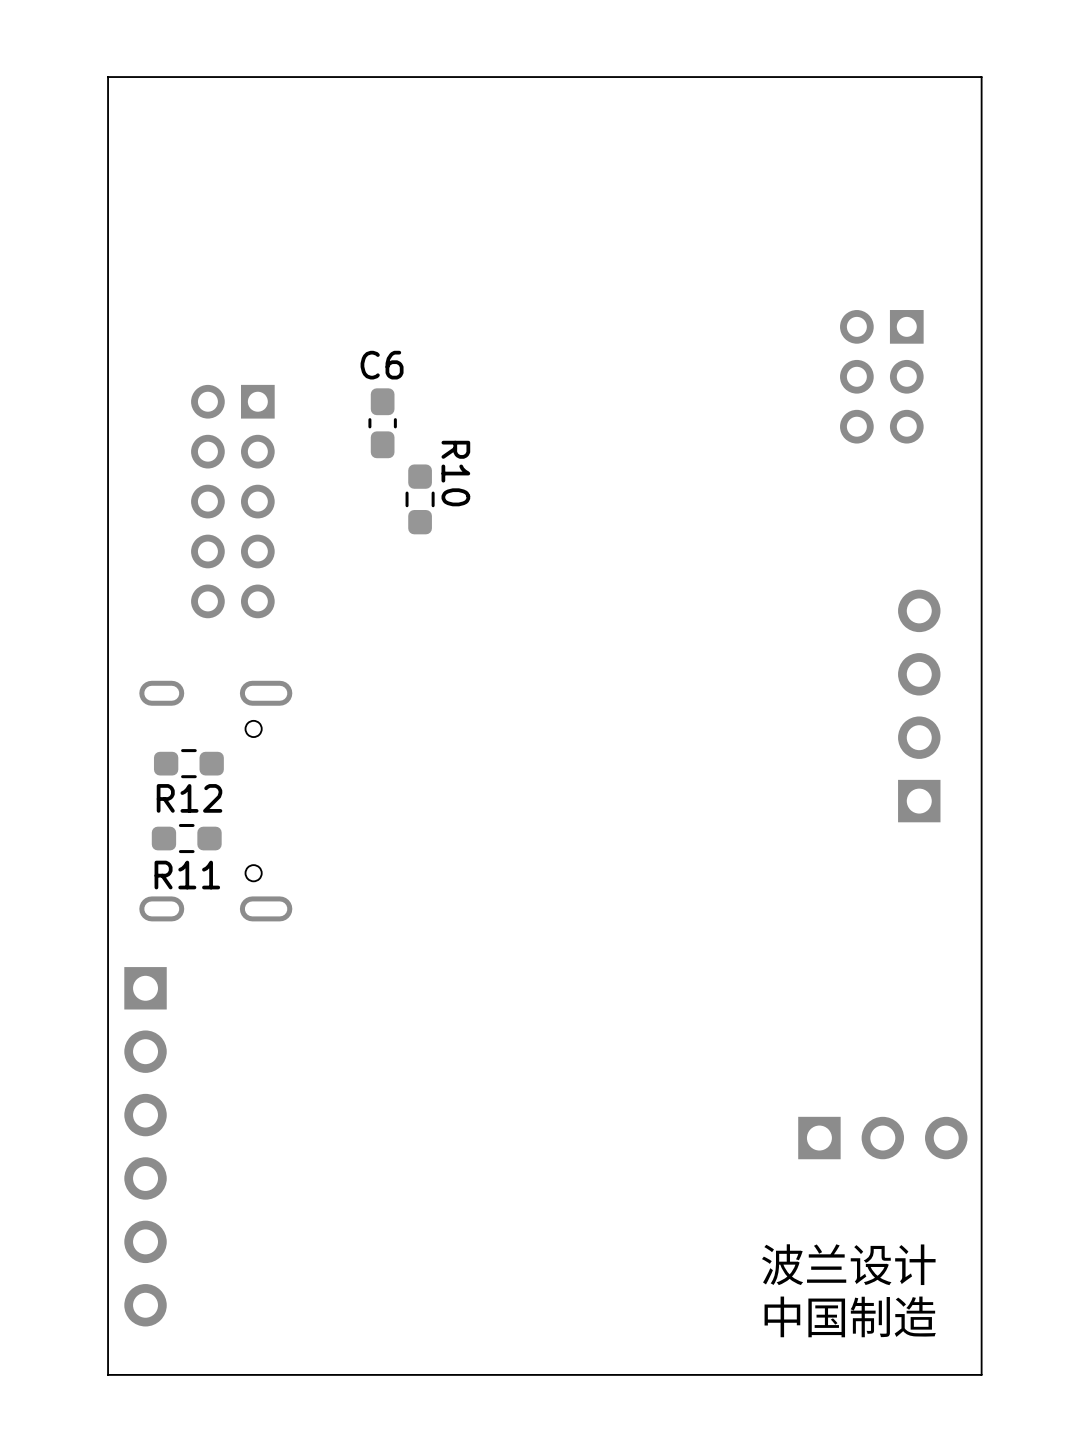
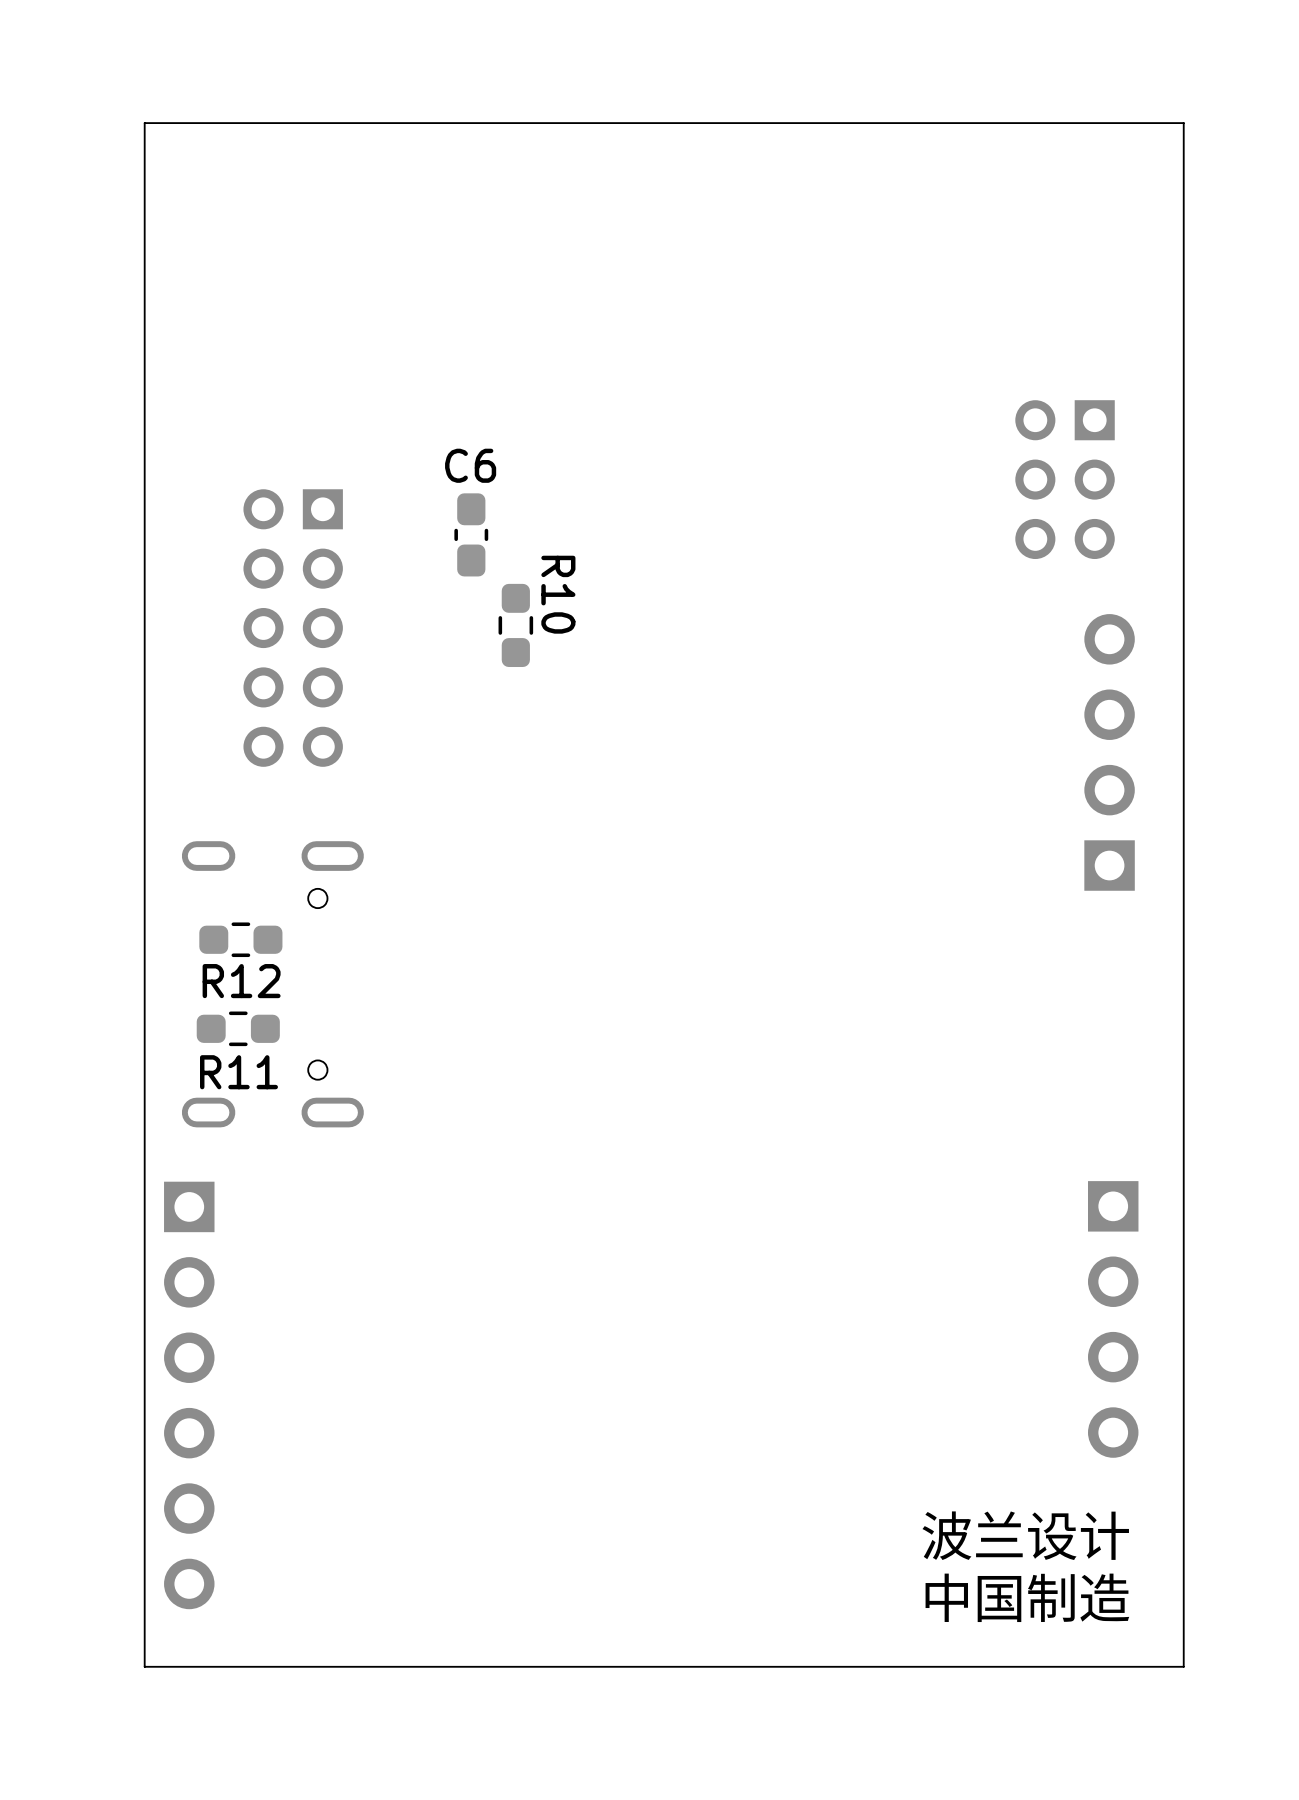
part position: (919, 705) -> (1109, 752)
part: none -> (1113, 1319)
part: (882, 1138) -> none

